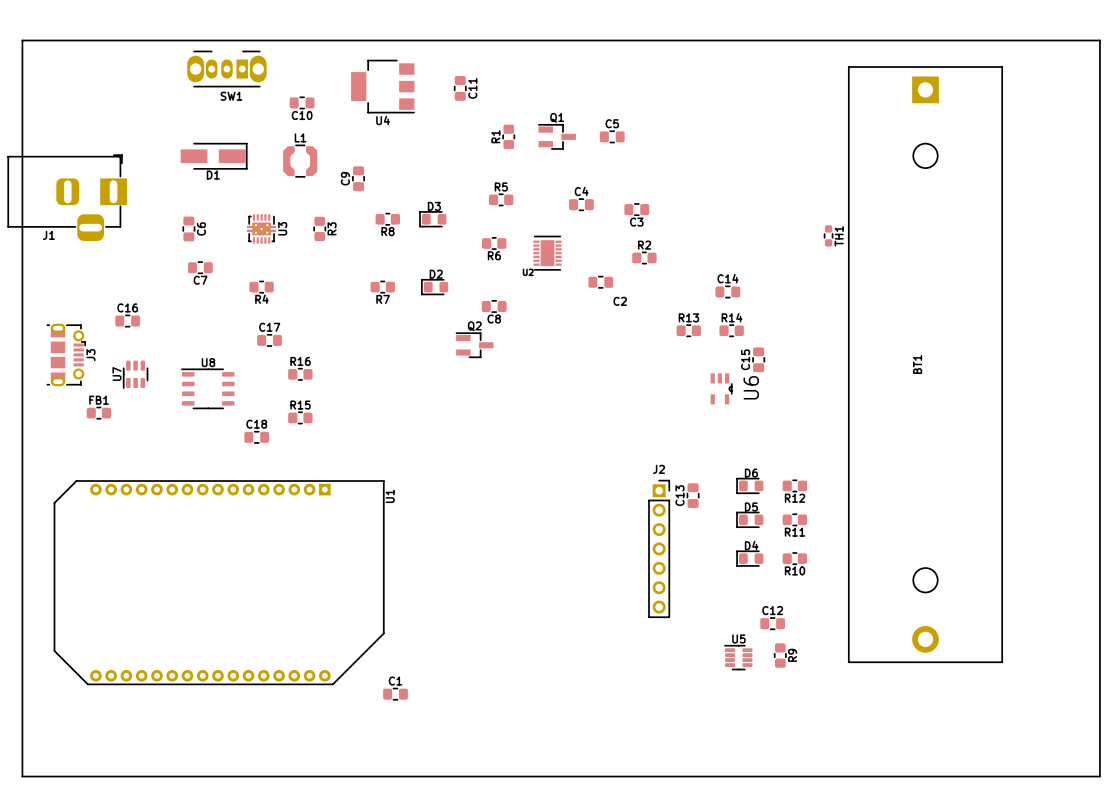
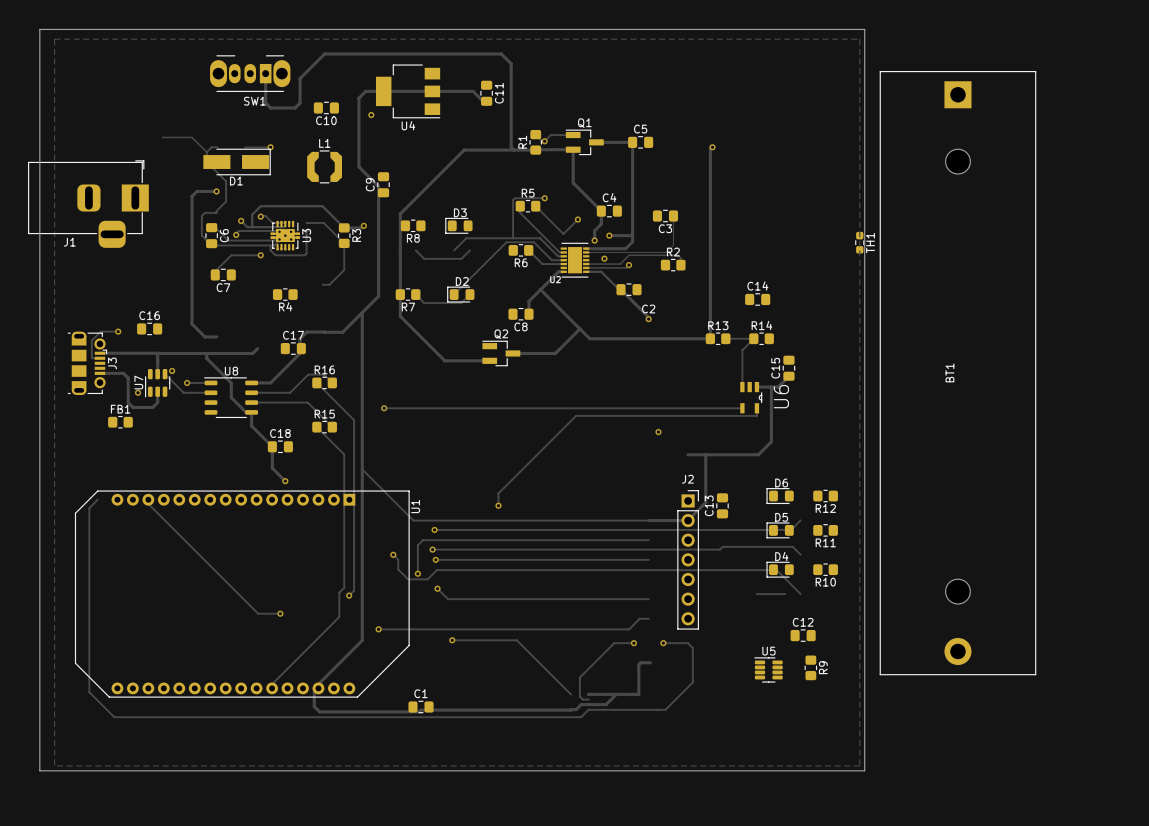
zone outline: none -> (54, 39) (859, 39) (859, 765) (54, 765) (54, 39)
board edge: (22, 40) (1099, 40) (1099, 776) (22, 776) (22, 40) -> (39, 29) (39, 770) (864, 770) (864, 29) (39, 29)
track: none -> (265, 73) (265, 103) (270, 107) (295, 107) (300, 103) (300, 78) (324, 53) (501, 53) (511, 63) (511, 147) (513, 150)
track: none -> (486, 104) (473, 91) (365, 91) (358, 98) (358, 166) (378, 186) (378, 296) (342, 332) (306, 332) (300, 338) (300, 353) (270, 382) (251, 382)
via: none -> (371, 115)
track: none -> (535, 134) (542, 141) (550, 135) (573, 135)
track: none -> (162, 137) (192, 137) (206, 152)
via: none -> (544, 141)
track: none -> (596, 142) (632, 142) (632, 241) (625, 248) (586, 248)
track: none -> (217, 147) (211, 147) (206, 152)
track: none -> (244, 147) (270, 147)
via: none -> (270, 147)
track: none -> (712, 147) (710, 149) (710, 338) (589, 338) (540, 289)
via: none -> (712, 147)
track: none -> (206, 152) (206, 162) (226, 181) (226, 201) (216, 212) (204, 212) (201, 216) (201, 235) (211, 245) (274, 245) (283, 238)
track: none -> (216, 191) (196, 191) (192, 196) (192, 324) (204, 336) (216, 336)
via: none -> (216, 191)
track: none -> (544, 198) (515, 198) (513, 200) (513, 238)
via: none -> (544, 198)
track: none -> (520, 206) (520, 212) (559, 252) (563, 252)
track: none -> (535, 206) (563, 233) (577, 219)
track: none -> (601, 211) (573, 182) (573, 149) (464, 150) (400, 213) (400, 316) (444, 360) (489, 360)
track: none -> (601, 211) (601, 224) (594, 230) (594, 240)
track: none -> (673, 216) (673, 245) (666, 252) (586, 252)
track: none -> (260, 216) (265, 216) (272, 223) (283, 223)
via: none -> (260, 216)
via: none -> (577, 219)
track: none -> (241, 220) (247, 227) (283, 227)
via: none -> (241, 220)
track: none -> (306, 223) (323, 223) (344, 243) (344, 270) (329, 284) (322, 284)
track: none -> (363, 225) (361, 227) (344, 227) (322, 206) (260, 206) (252, 214) (252, 227)
via: none -> (363, 225)
track: none -> (216, 228) (228, 240) (274, 240) (280, 234) (283, 234)
track: none -> (283, 230) (238, 230) (236, 234)
track: none -> (308, 230) (306, 230) (304, 255) (275, 255) (270, 250) (270, 245)
track: none -> (632, 234) (609, 235)
via: none -> (236, 234)
via: none -> (609, 235)
via: none -> (594, 240)
track: none -> (415, 250) (424, 258) (461, 258) (470, 250)
track: none -> (454, 250) (466, 238) (540, 238) (558, 256) (563, 256)
track: none -> (528, 250) (542, 264) (563, 264)
track: none -> (260, 255) (231, 255) (216, 270)
via: none -> (260, 255)
via: none -> (604, 258)
track: none -> (563, 260) (551, 260) (533, 242) (506, 242) (454, 294)
track: none -> (586, 264) (620, 264) (629, 255) (678, 255) (680, 258) (680, 265)
track: none -> (629, 265) (626, 267) (585, 267)
via: none -> (629, 265)
track: none -> (563, 271) (558, 271) (540, 289)
track: none -> (586, 271) (601, 271) (648, 319)
track: none -> (540, 289) (529, 301) (529, 314) (529, 307)
track: none -> (415, 294) (424, 303) (461, 303) (470, 294)
track: none -> (362, 312) (362, 640) (314, 688) (314, 706) (319, 711) (570, 710) (576, 709) (581, 704) (606, 704) (616, 694)
via: none -> (648, 319)
track: none -> (579, 328) (555, 353) (512, 353)
track: none -> (118, 331) (100, 331) (91, 340) (91, 357) (99, 358)
via: none -> (118, 331)
track: none -> (725, 338) (753, 338) (742, 350) (742, 387)
track: none -> (257, 348) (252, 353) (157, 353)
track: none -> (99, 353) (157, 353)
track: none -> (157, 353) (157, 374)
track: none -> (206, 353) (206, 358) (231, 382) (231, 397) (246, 412) (251, 412)
via: none -> (172, 371)
track: none -> (99, 373) (123, 373) (128, 378) (128, 402) (133, 407) (152, 407) (157, 402) (157, 391)
track: none -> (165, 374) (183, 392) (211, 392)
track: none -> (788, 376) (778, 387) (756, 387)
track: none -> (187, 382) (212, 382)
via: none -> (187, 382)
track: none -> (316, 382) (354, 420) (354, 590) (349, 595)
track: none -> (332, 382) (323, 374) (308, 374) (290, 392) (251, 392)
track: none -> (770, 387) (771, 441) (758, 454) (687, 454)
via: none -> (138, 392)
track: none -> (251, 402) (307, 402) (332, 427)
track: none -> (384, 408) (742, 408)
via: none -> (384, 408)
track: none -> (756, 408) (756, 415) (576, 415) (498, 493) (498, 505)
track: none -> (251, 412) (251, 425) (272, 446) (272, 468) (285, 481)
track: none -> (316, 427) (344, 454) (344, 587) (339, 592) (339, 616) (267, 688)
via: none -> (658, 432)
track: none -> (705, 454) (705, 502) (687, 520) (413, 520) (362, 469)
via: none -> (285, 481)
track: none -> (97, 499) (89, 508) (89, 692) (114, 717) (581, 717) (588, 709) (665, 709) (692, 682) (692, 648) (687, 643) (663, 643)
track: none -> (144, 499) (258, 613) (280, 613)
via: none -> (498, 505)
track: none -> (800, 520) (791, 529) (434, 529)
via: none -> (434, 529)
track: none -> (648, 540) (422, 540) (417, 545) (417, 573)
track: none -> (432, 549) (719, 549) (722, 546) (792, 546) (800, 554)
via: none -> (432, 549)
track: none -> (393, 554) (398, 559) (398, 569) (408, 579) (427, 579) (436, 570) (776, 570) (800, 594)
via: none -> (393, 554)
track: none -> (435, 559) (648, 559)
via: none -> (435, 559)
via: none -> (417, 573)
track: none -> (437, 588) (447, 599) (648, 599)
via: none -> (437, 588)
track: none -> (756, 594) (785, 594)
via: none -> (349, 595)
via: none -> (280, 613)
track: none -> (648, 618) (639, 618) (629, 629) (378, 629)
via: none -> (378, 629)
track: none -> (452, 640) (516, 640) (571, 694)
via: none -> (452, 640)
track: none -> (633, 643) (614, 643) (579, 677) (579, 696) (582, 699) (588, 699)
via: none -> (633, 643)
via: none -> (663, 643)
track: none -> (650, 662) (638, 664) (638, 694) (588, 694)

